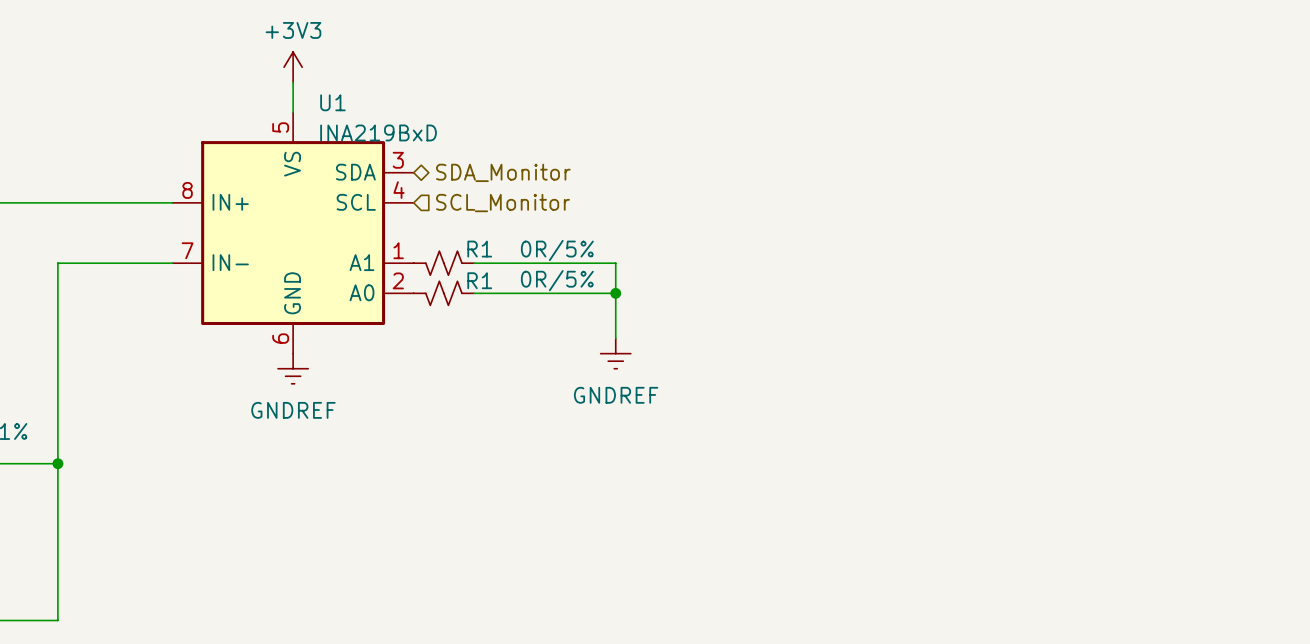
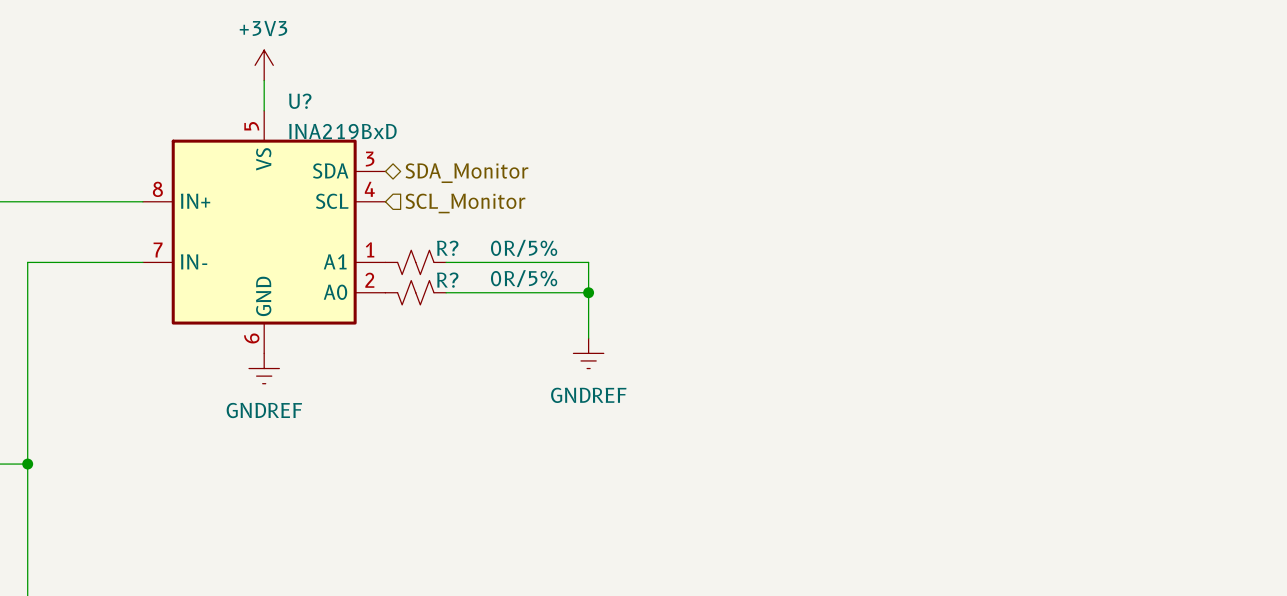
U1 name: U1 (332, 102) -> U? (300, 101)
R1 name: R1 (479, 249) -> R? (447, 248)
R1 name: R1 (479, 280) -> R? (447, 280)

